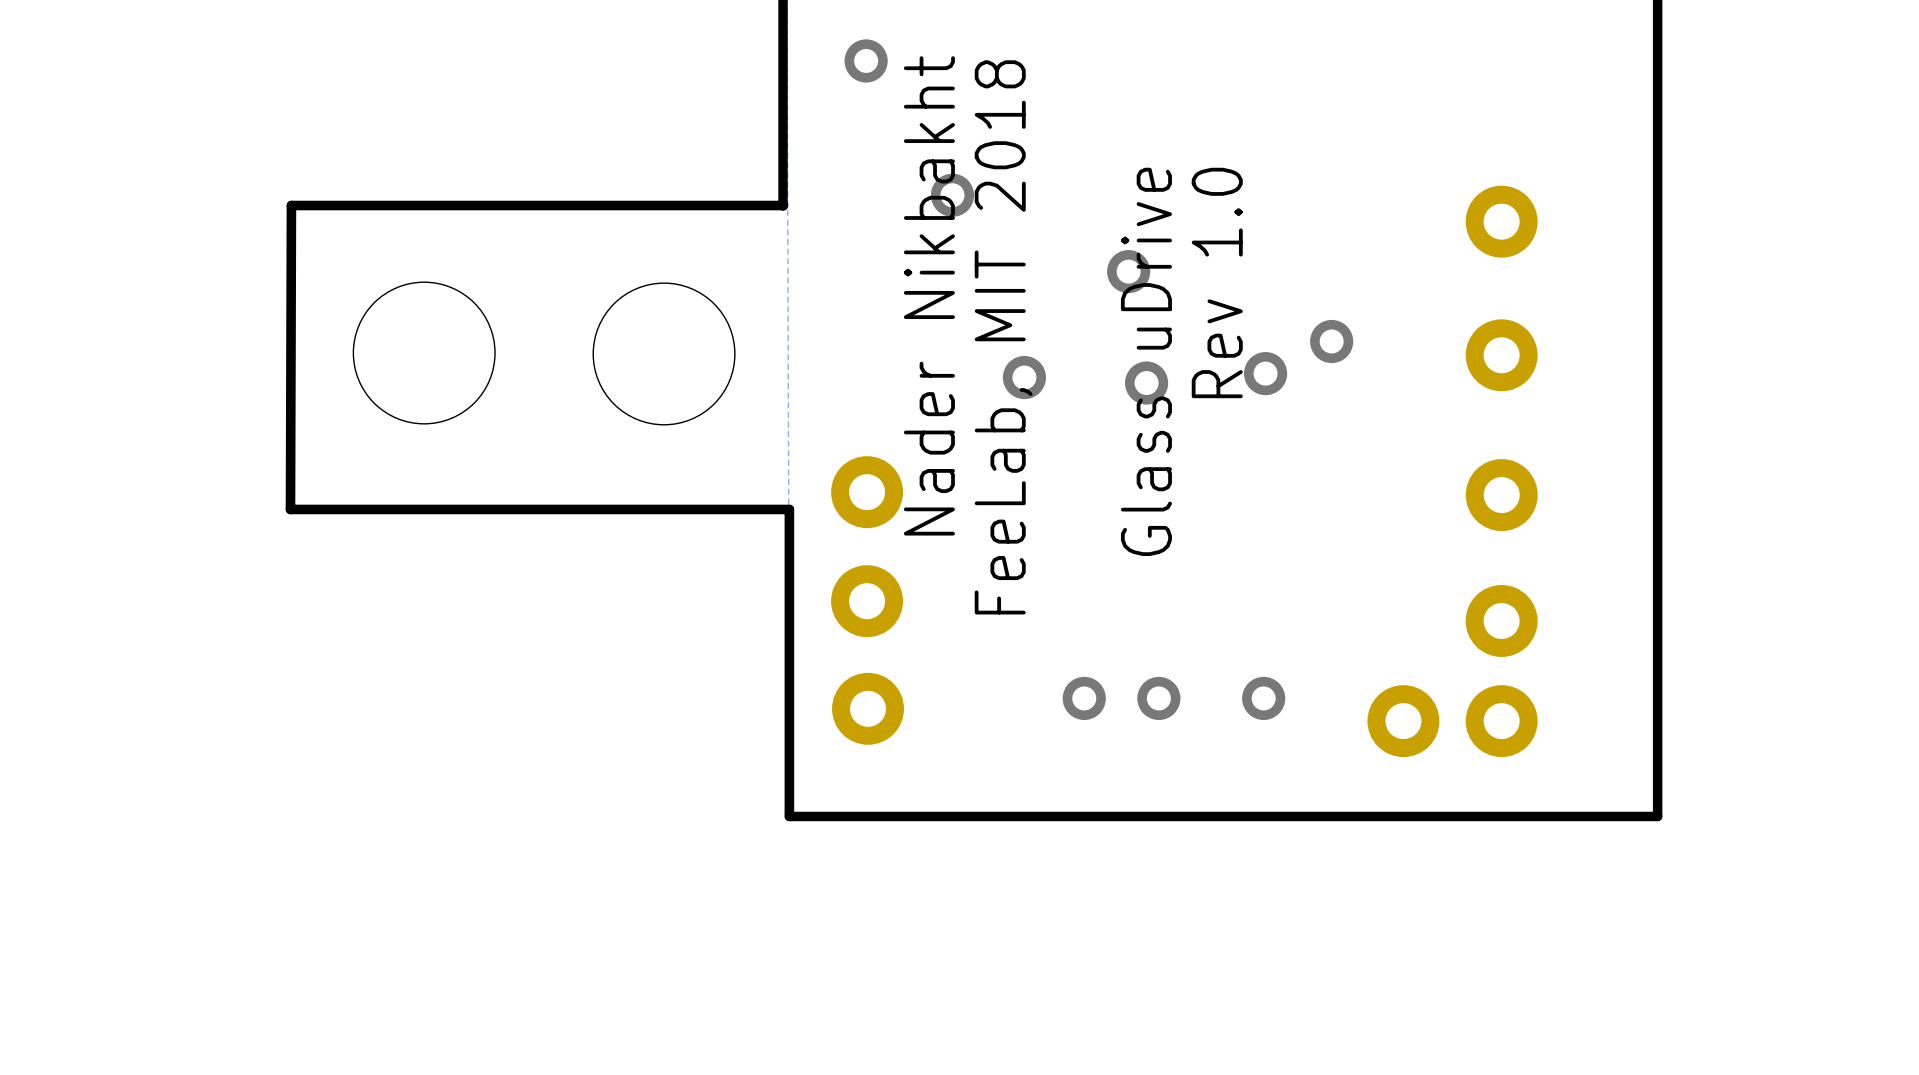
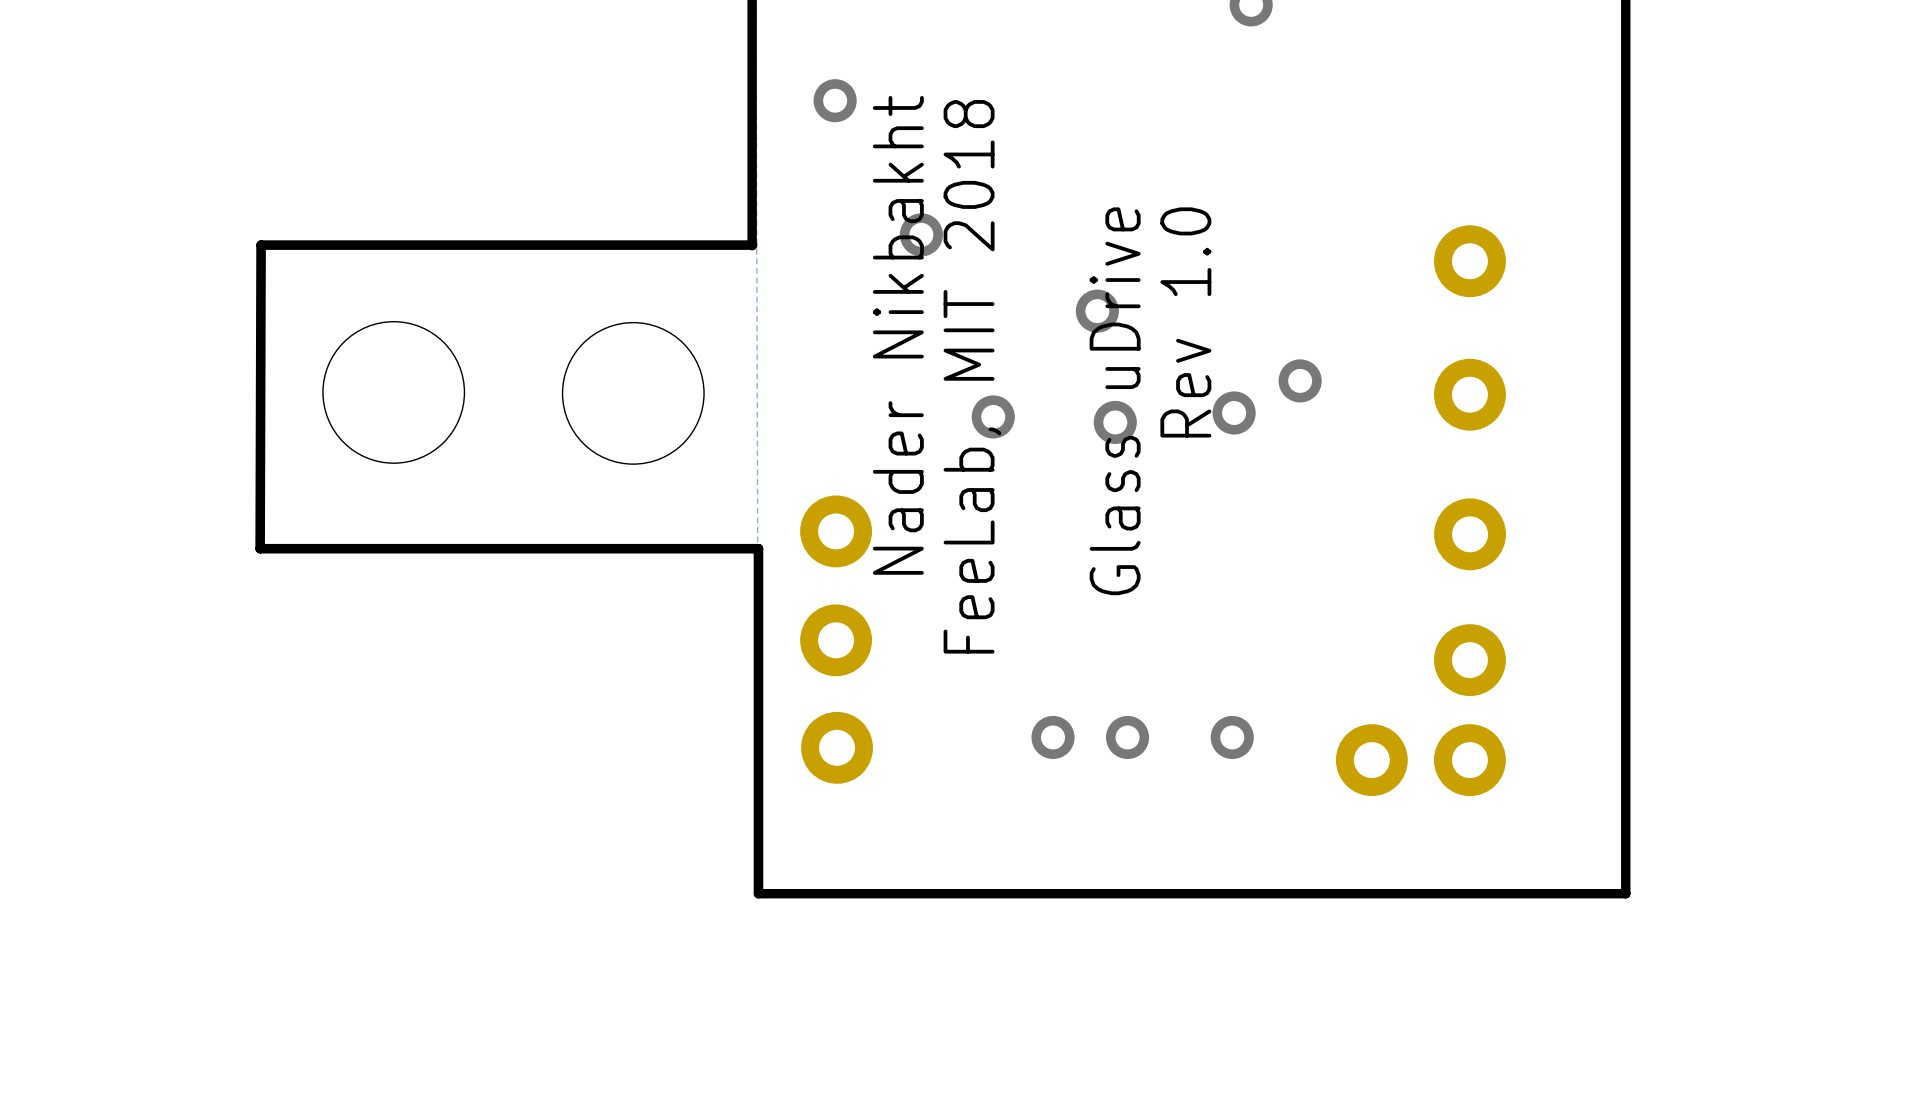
board edge: (1657, 816) (789, 816) -> (1625, 855) (1625, 893) (758, 893) (758, 855)

